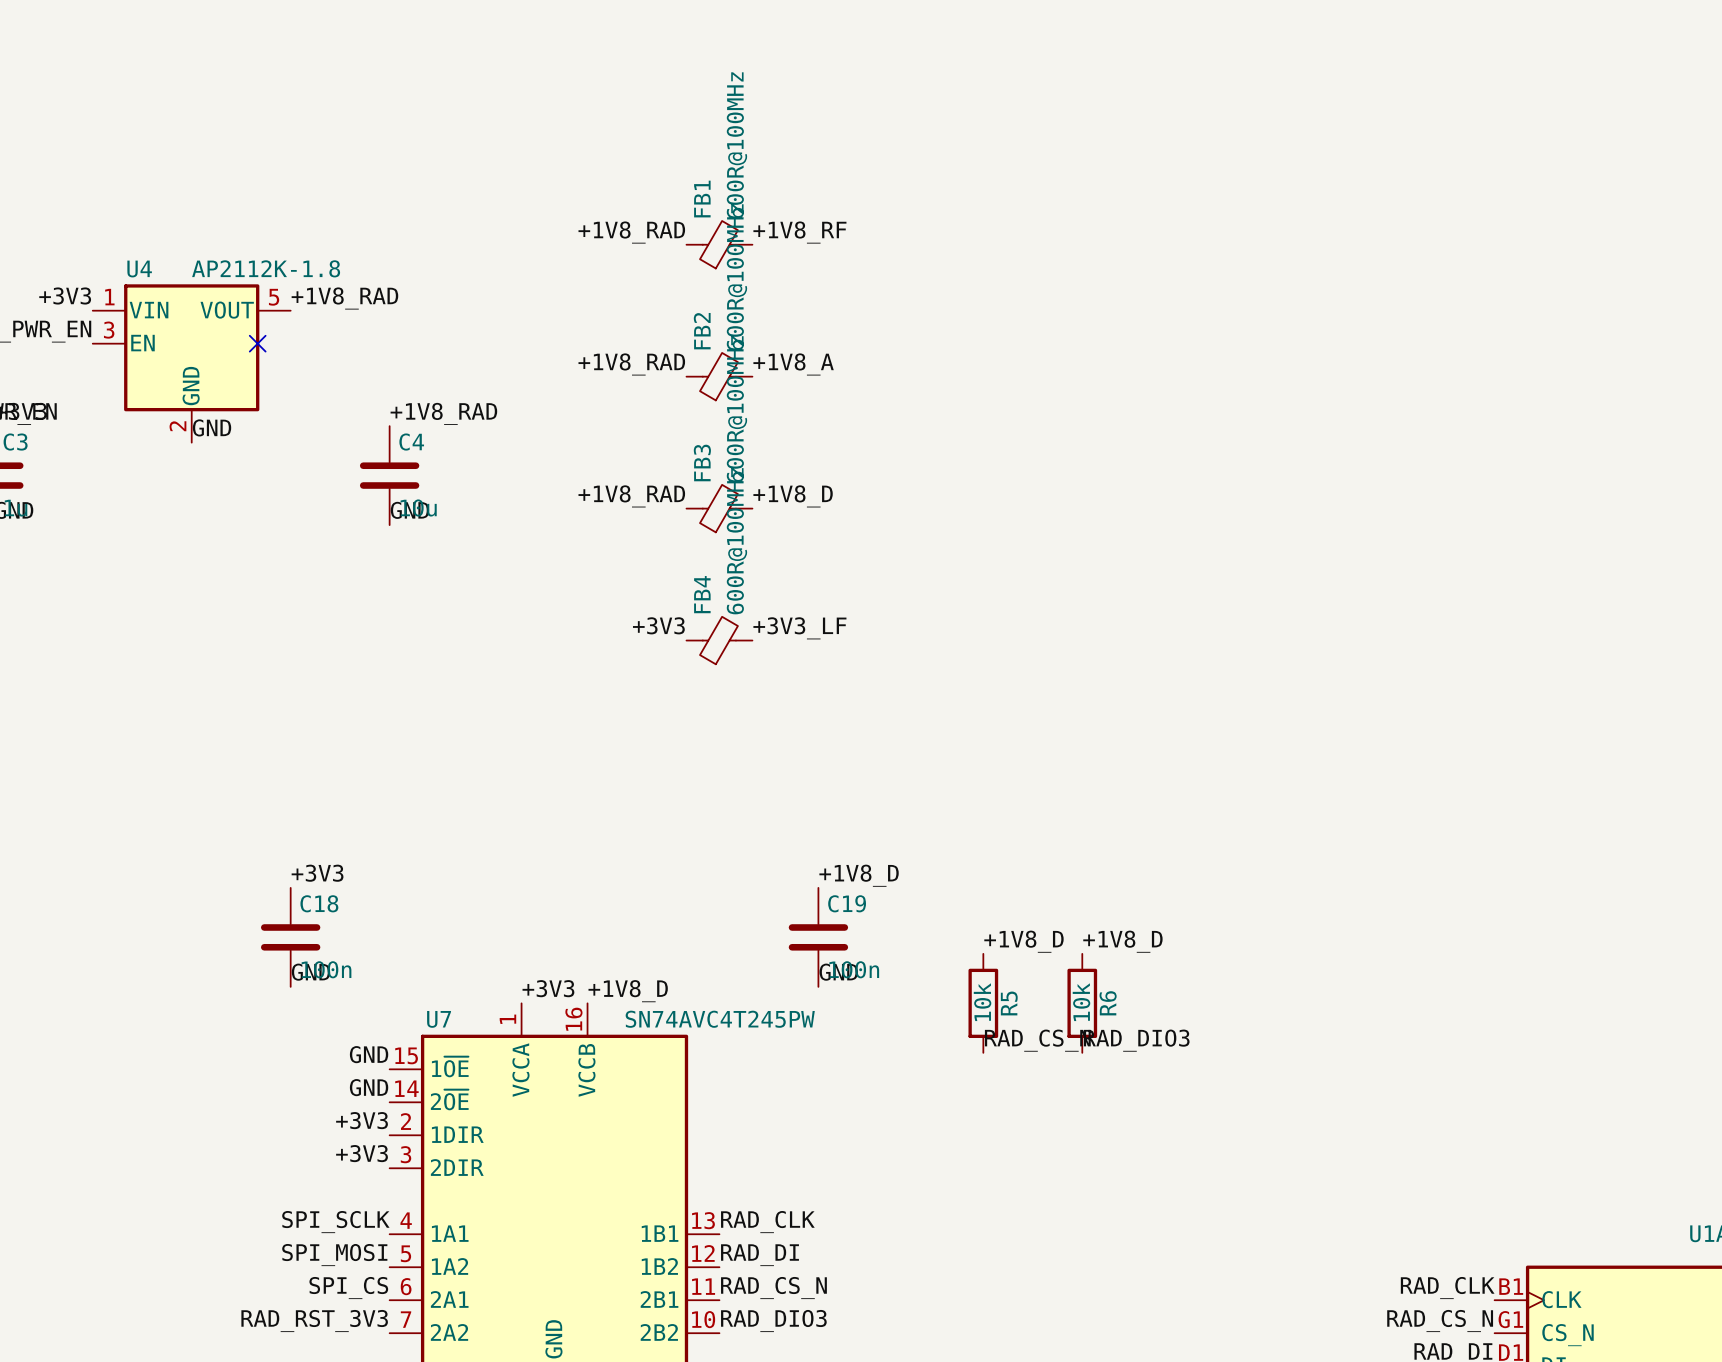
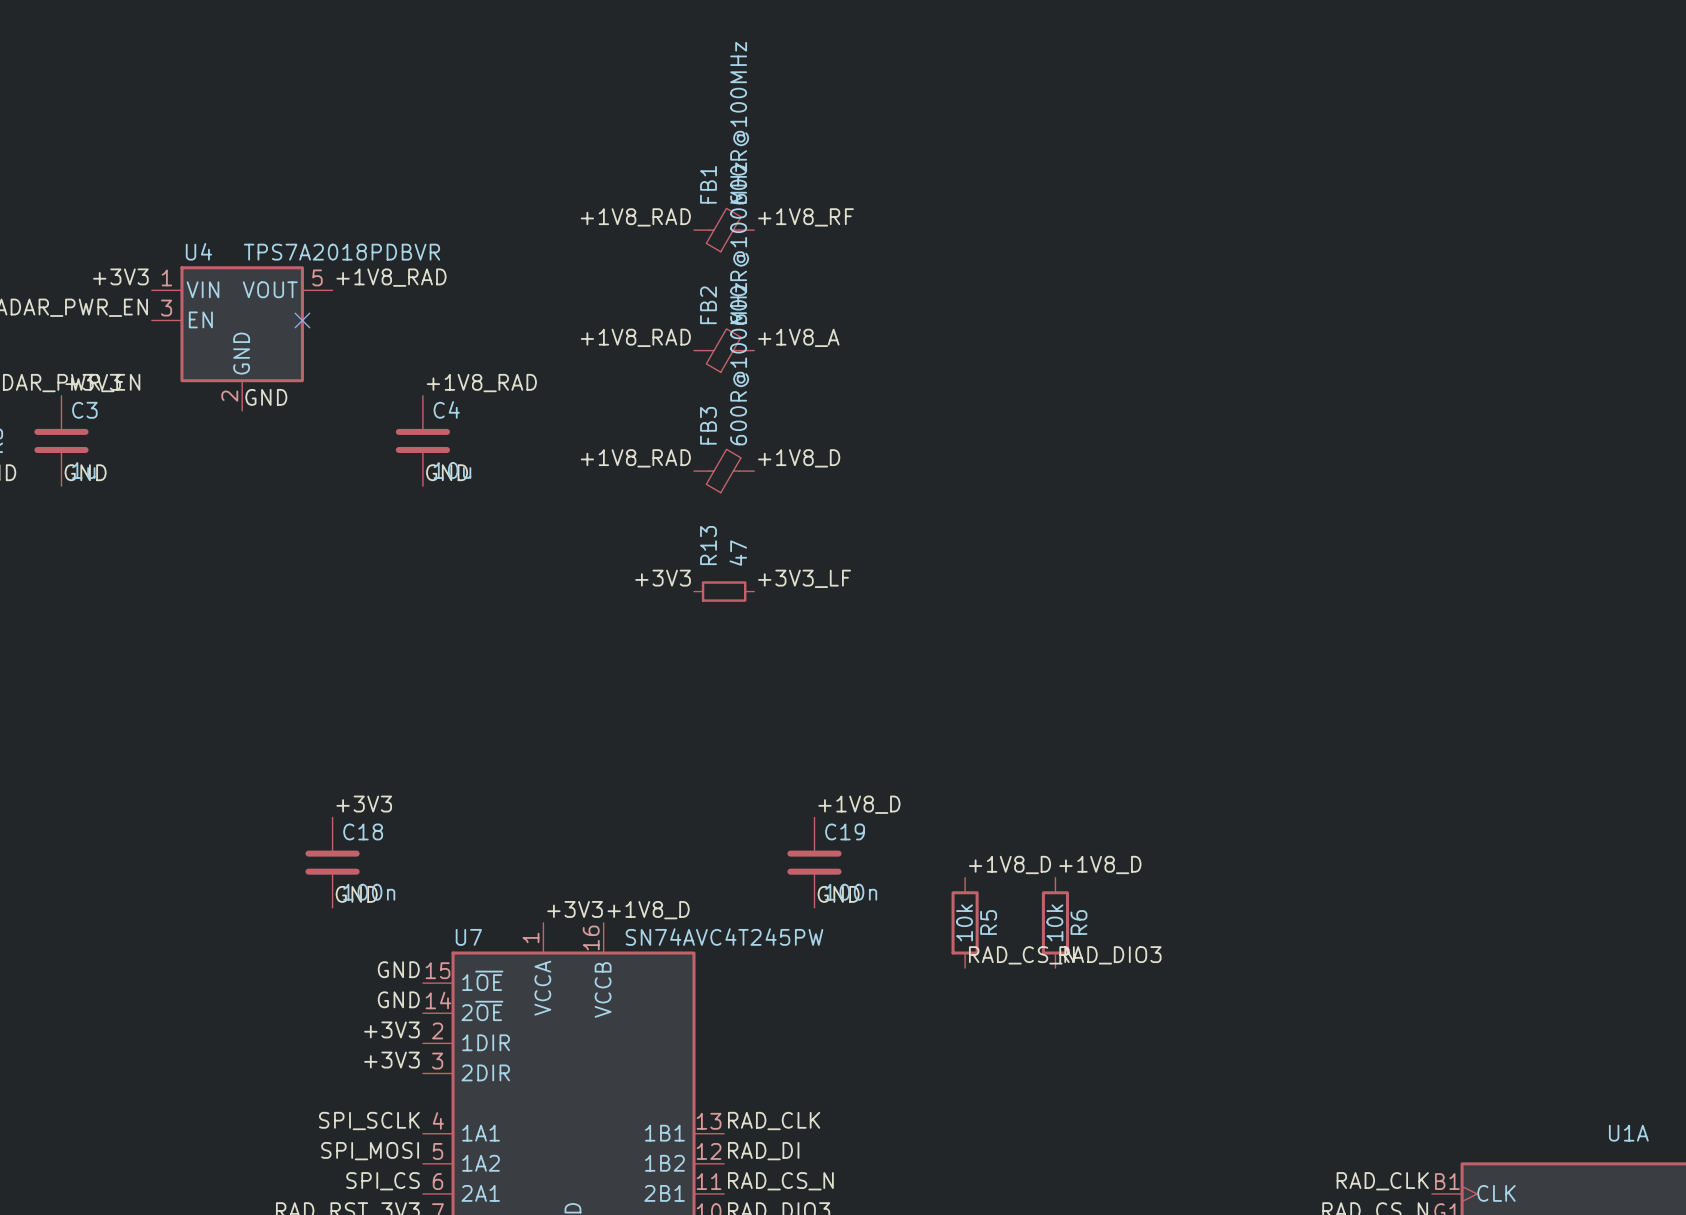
U4 value: AP2112K-1.8 (266, 268) -> TPS7A2018PDBVR (341, 252)
FB4: 600R@100MHz (719, 640) -> none
R13: none -> 47 (724, 591)

